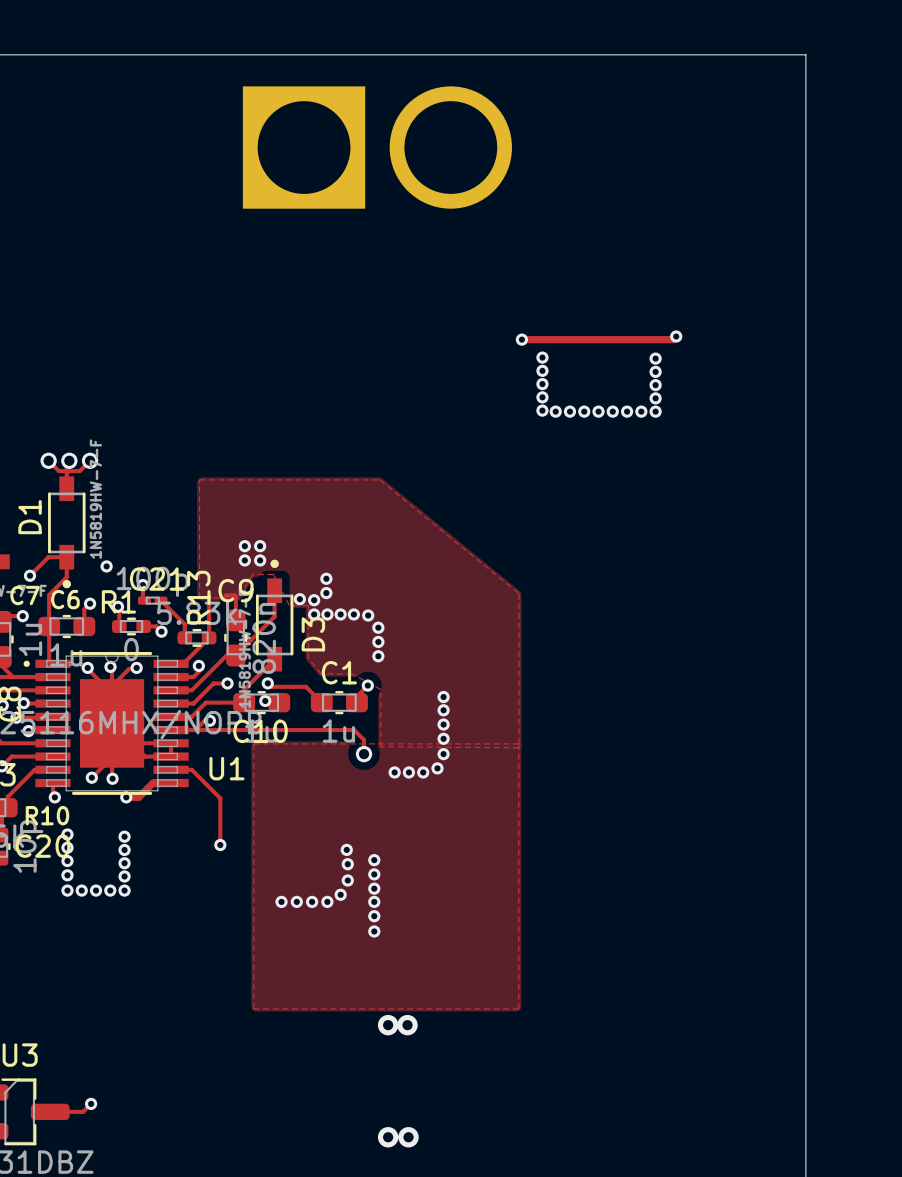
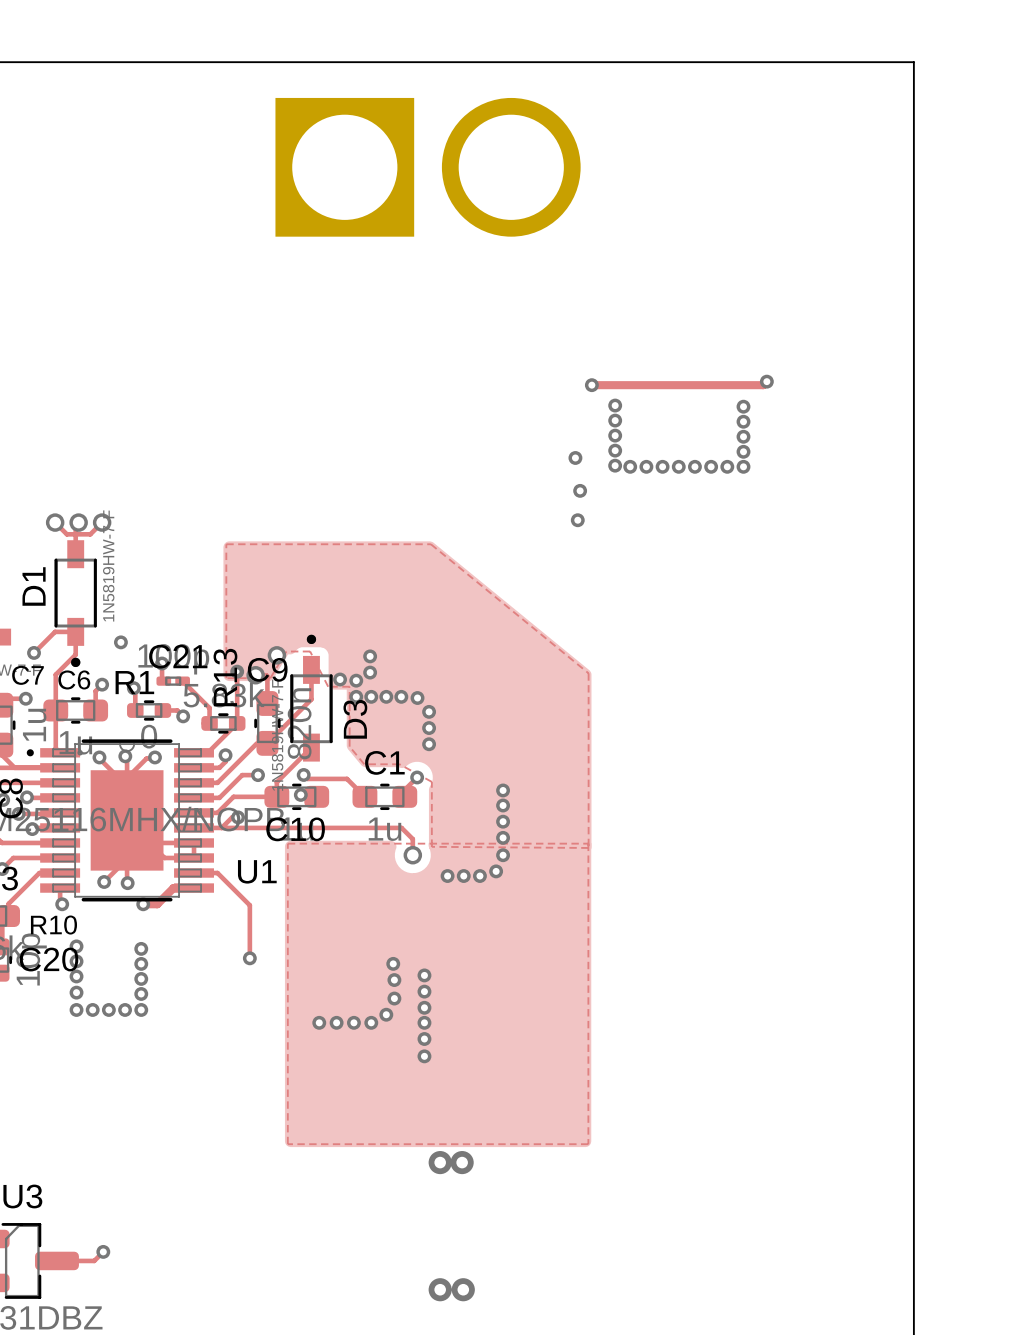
via: none -> (575, 457)
via: none -> (580, 490)
via: none -> (577, 520)
via: (244, 546) -> none
via: (260, 546) -> none
via: (244, 560) -> none
via: (260, 560) -> none
via: none -> (276, 655)
via: none -> (237, 671)
via: none -> (255, 675)

